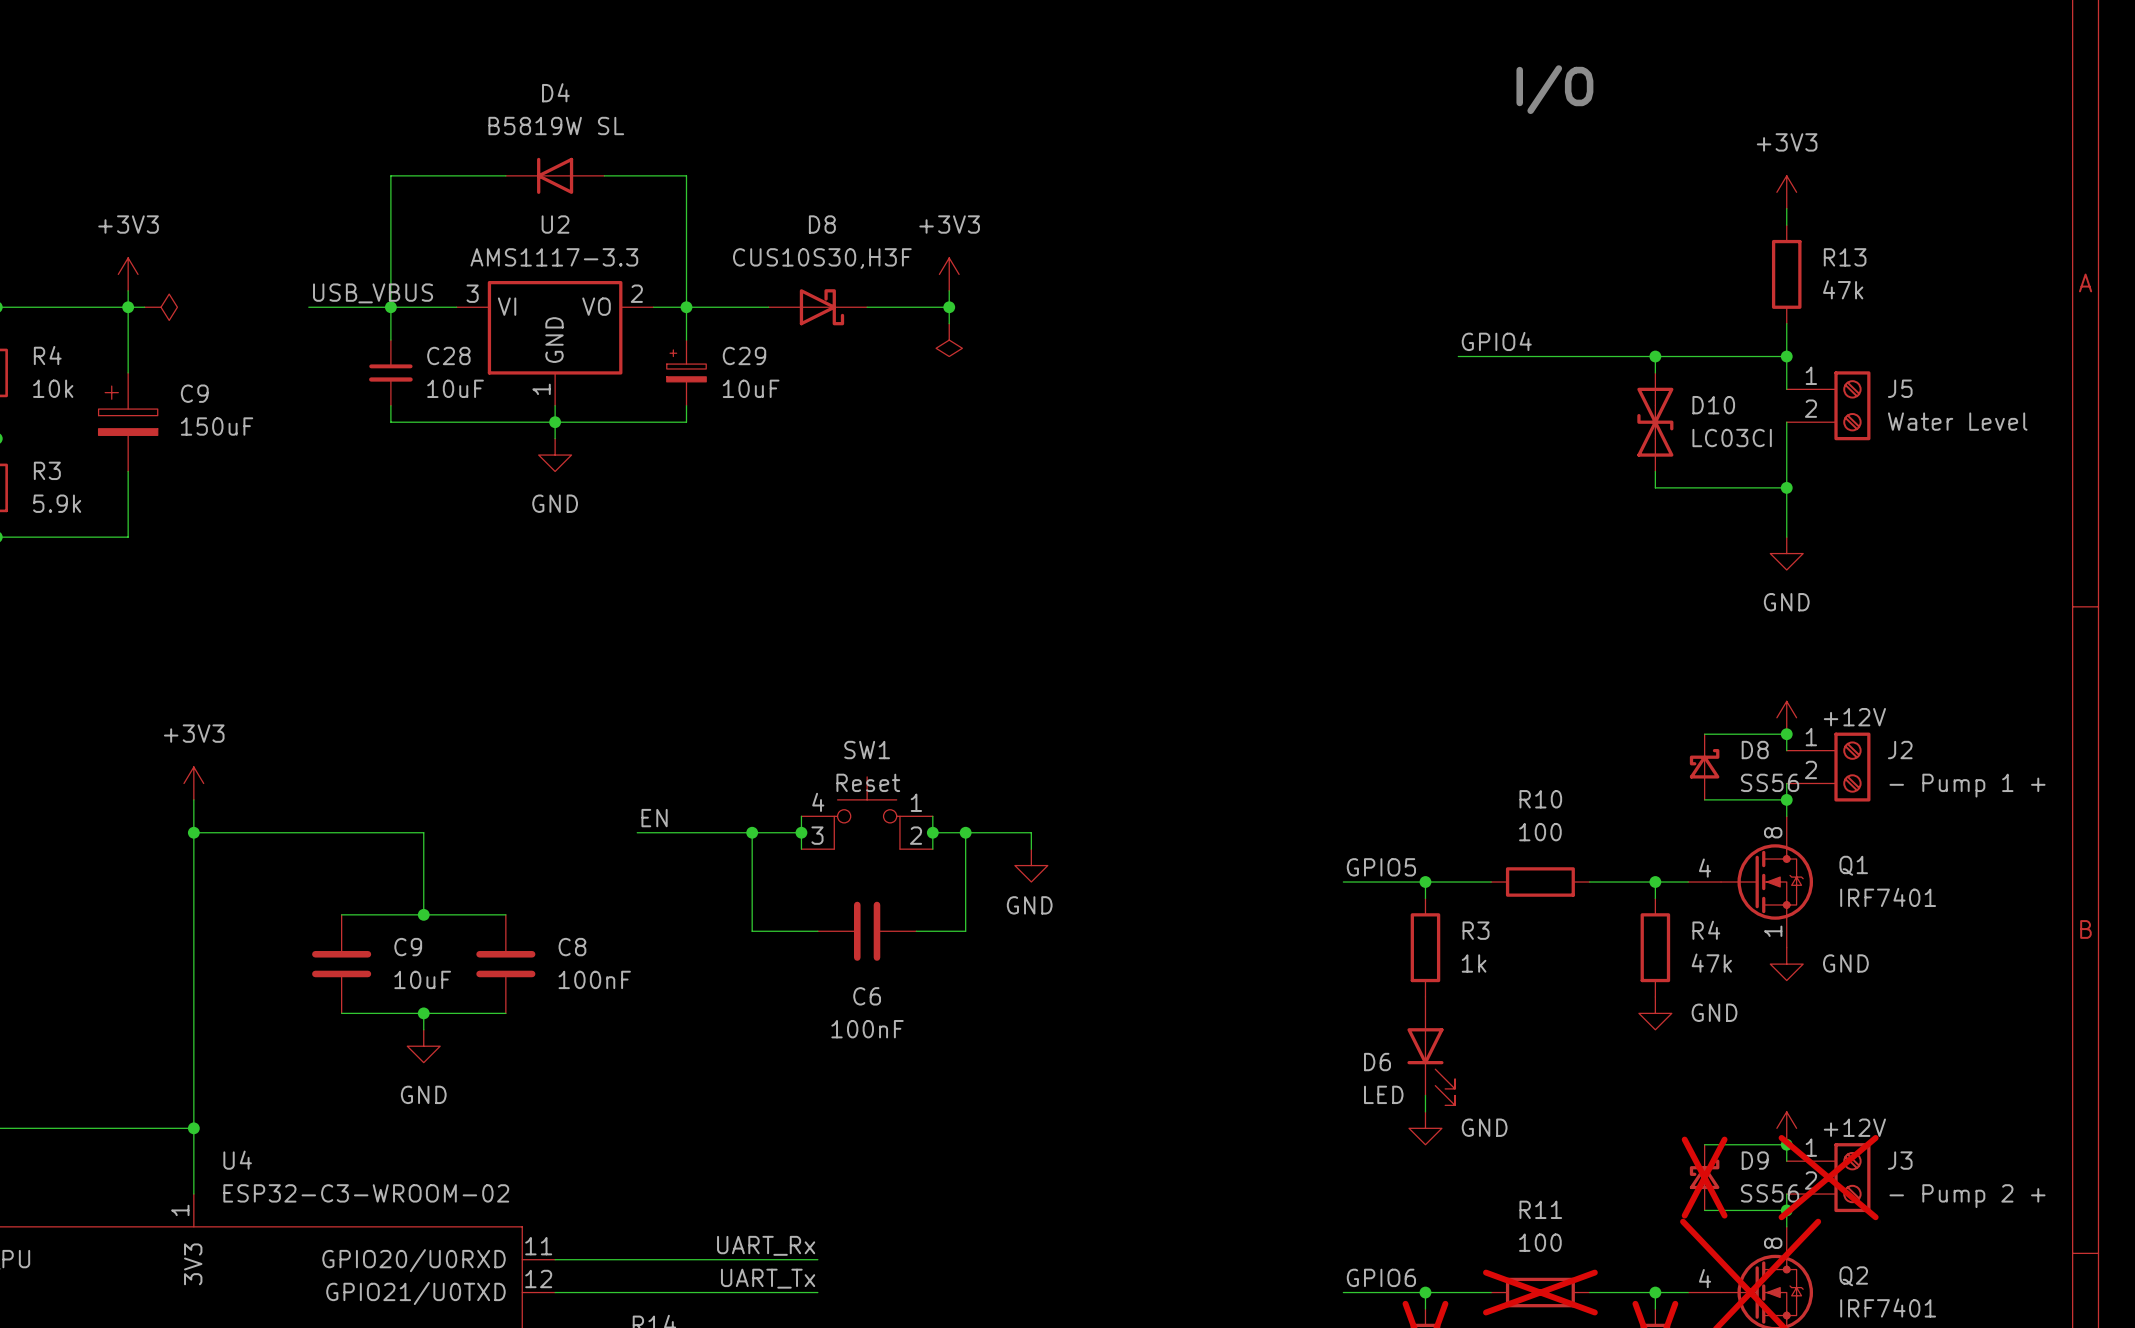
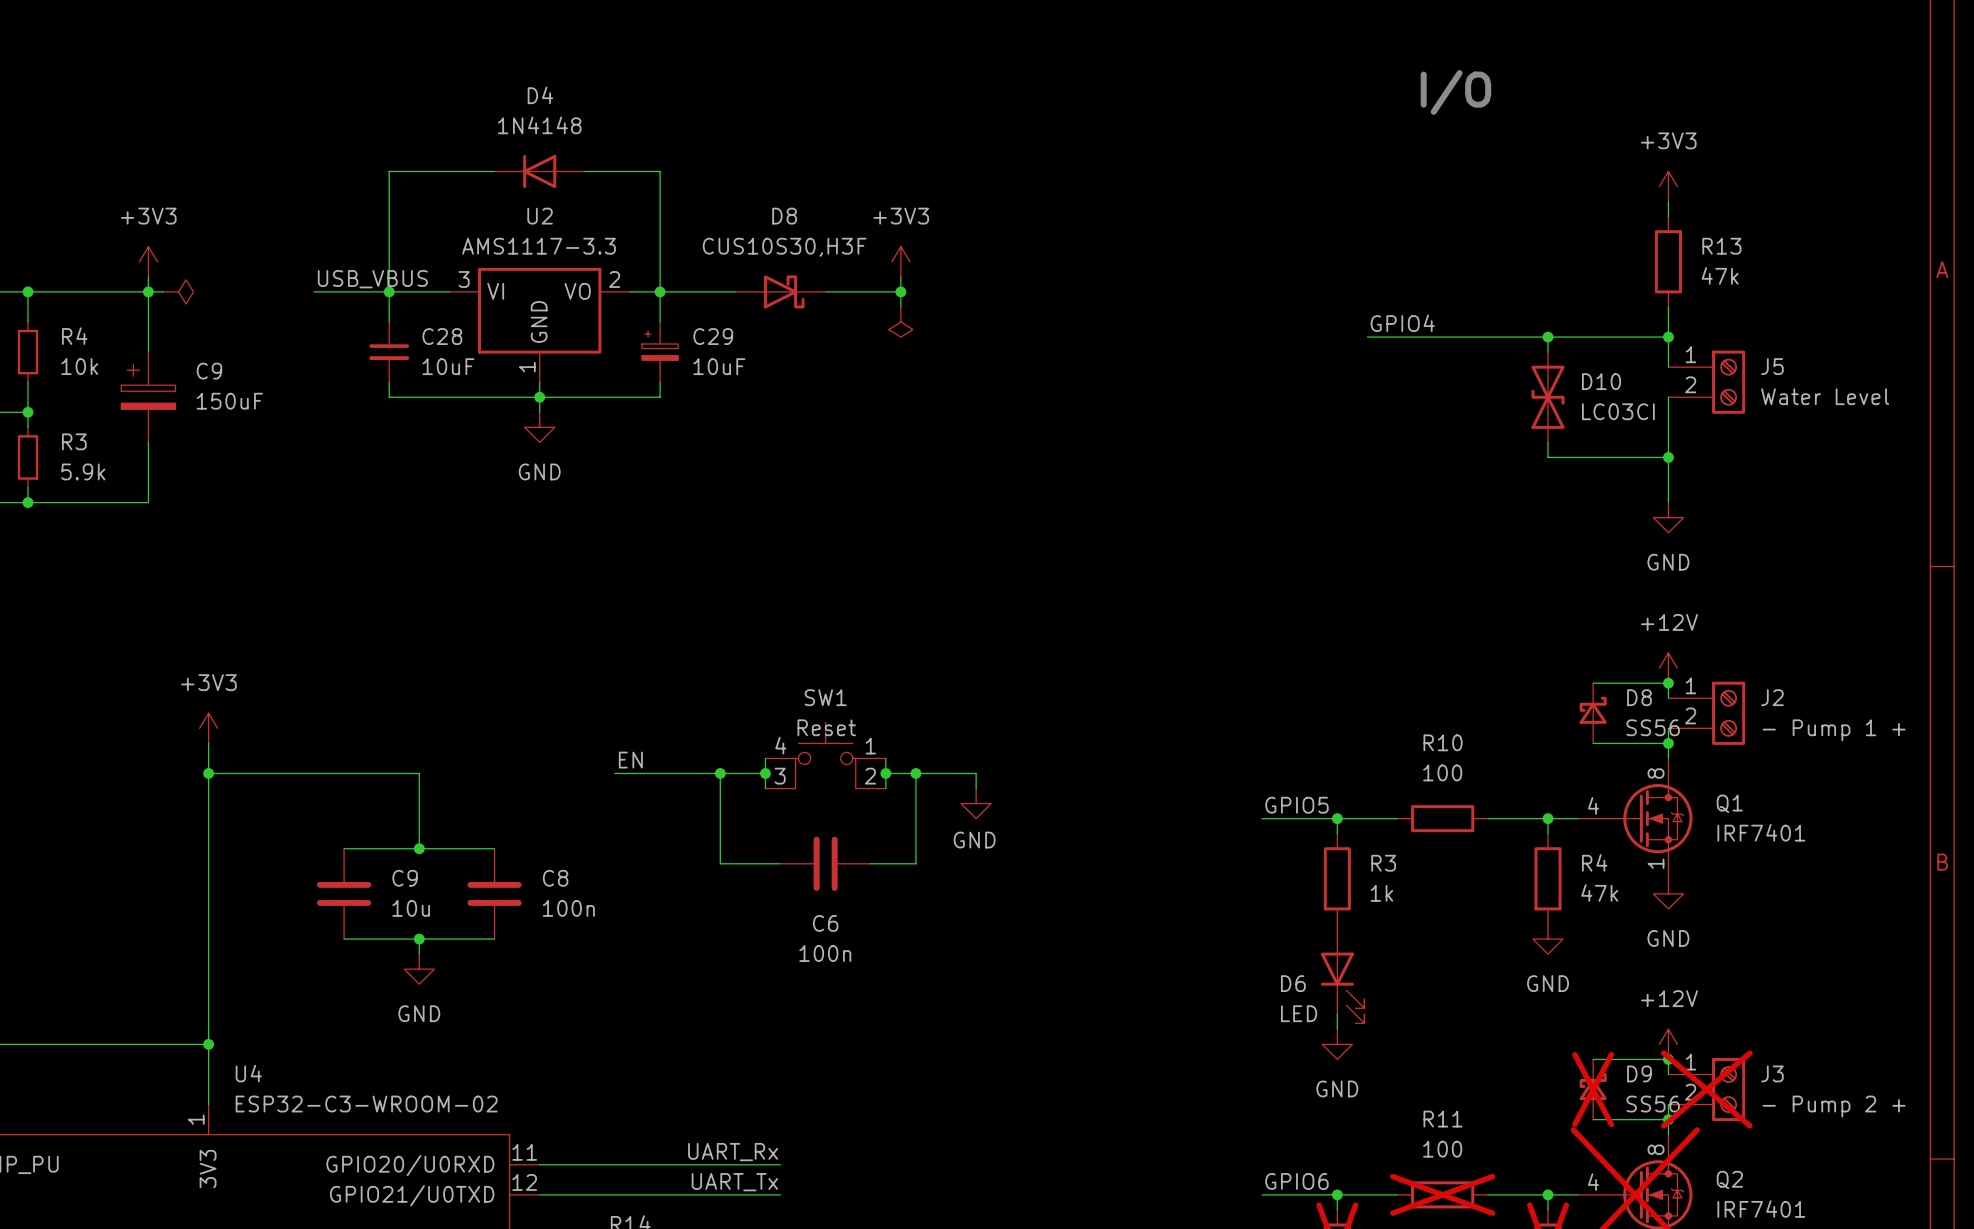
D4 value: B5819W SL (556, 125) -> 1N4148 (539, 125)
power symbol text position: +12V (1854, 717) -> +12V (1669, 622)
power symbol text position: GND (1845, 963) -> GND (1668, 938)
C9 value: 10uF (422, 979) -> 10u (411, 908)
C8 value: 100nF (594, 979) -> 100n (568, 908)
power symbol text position: GND (1714, 1012) -> GND (1548, 983)
C6 value: 100nF (867, 1029) -> 100n (825, 953)
power symbol text position: GND (1484, 1127) -> GND (1337, 1088)
power symbol text position: +12V (1854, 1127) -> +12V (1669, 998)

